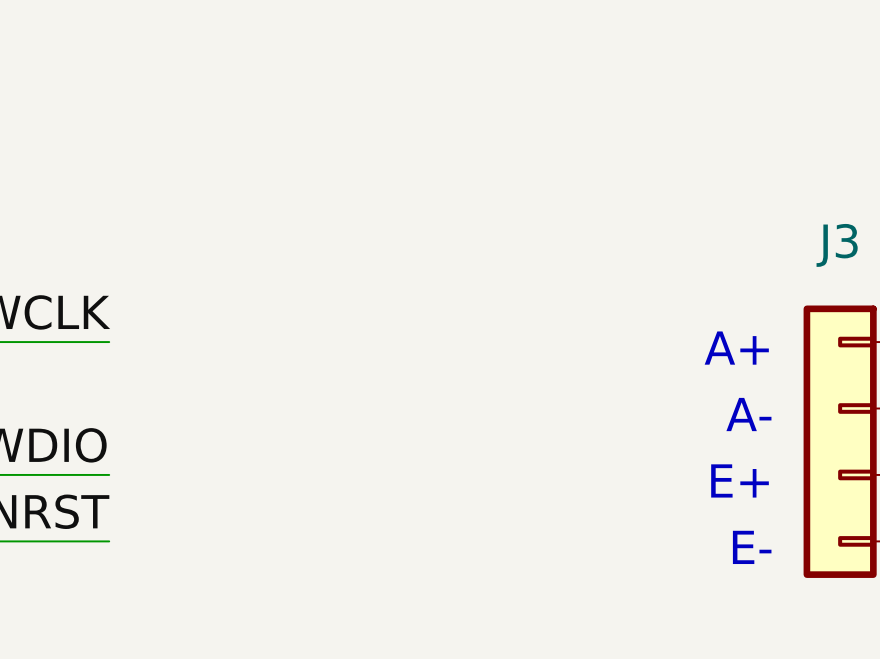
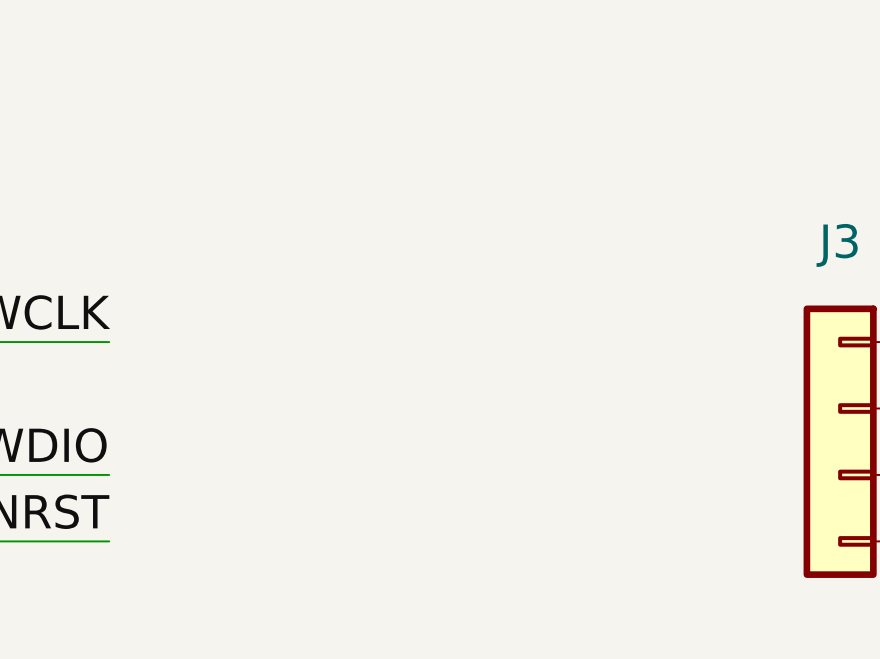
text: A+ (736, 348) -> none
text: A- (748, 414) -> none
text: E+ (740, 480) -> none
text: E- (752, 547) -> none

